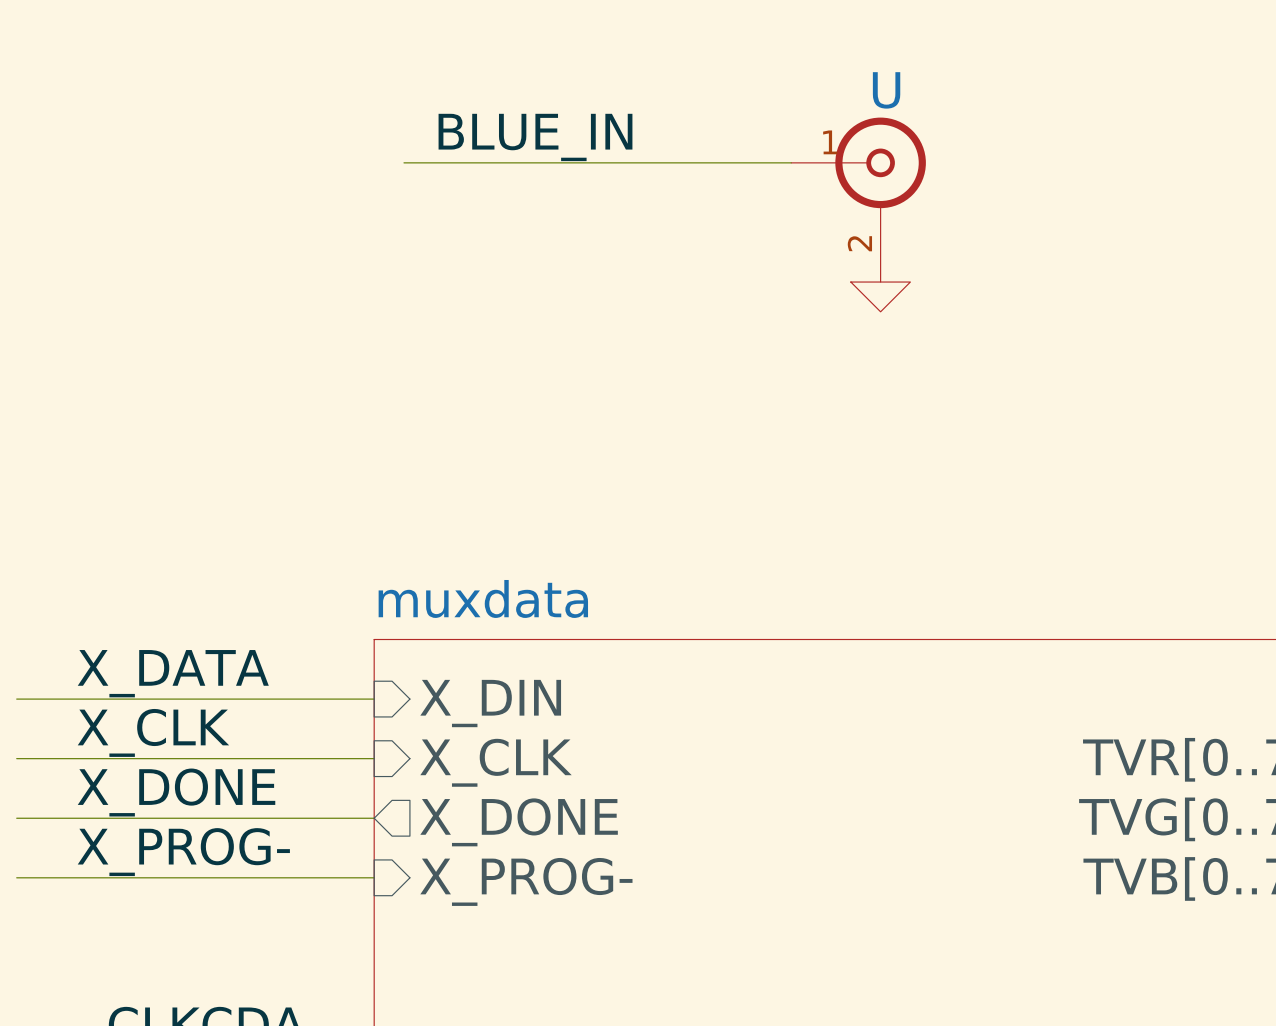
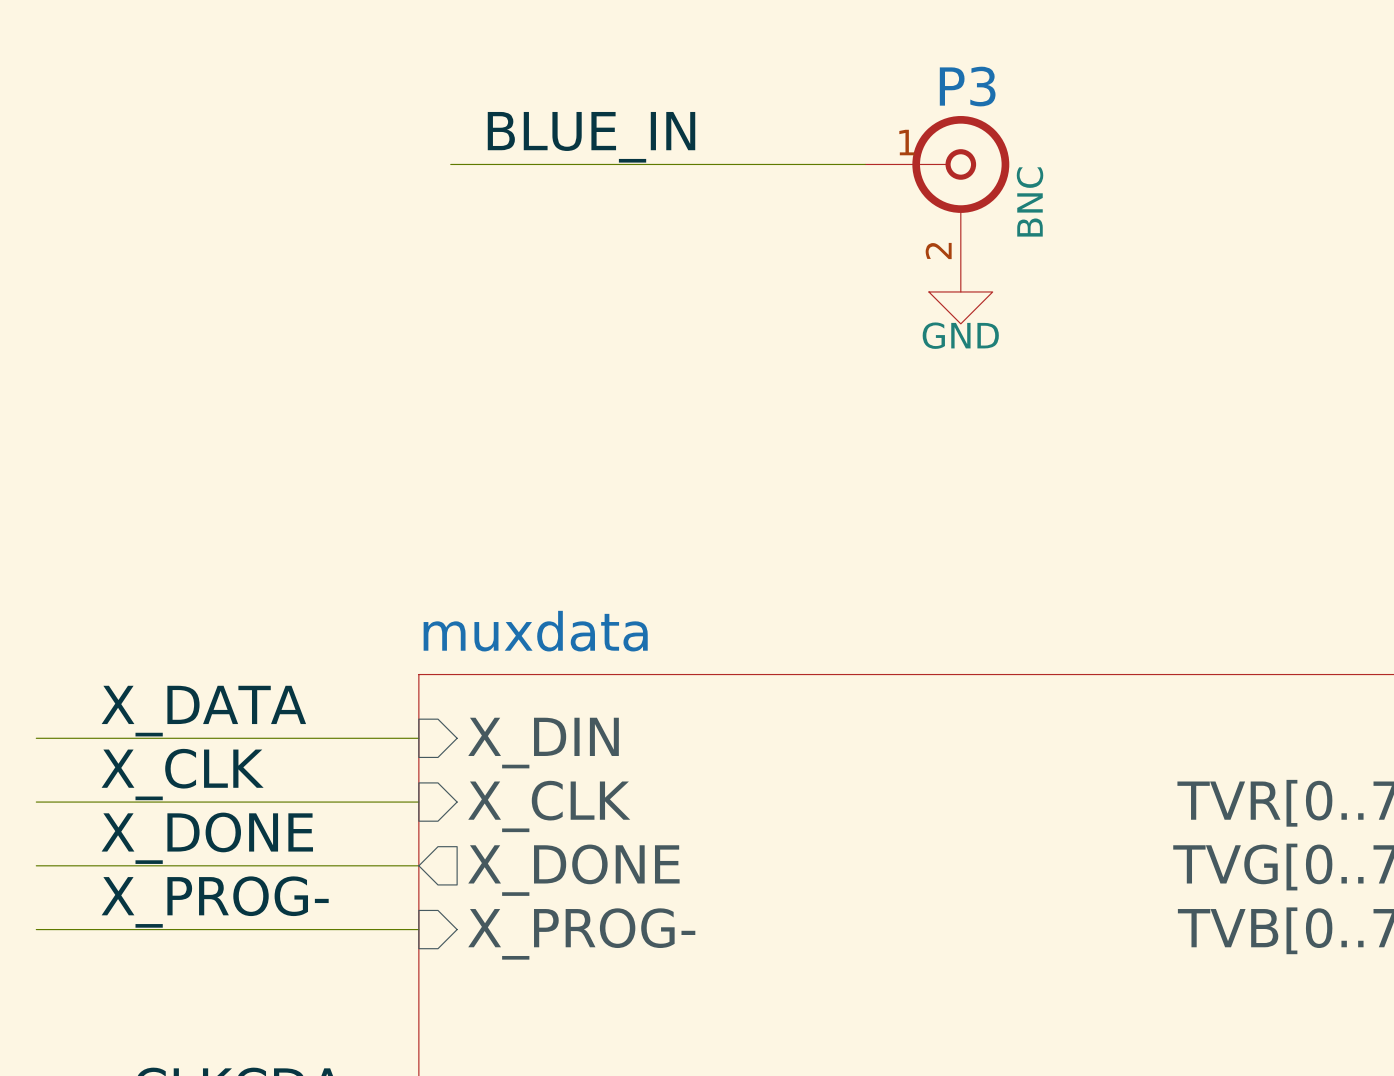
U name: U (886, 90) -> P3 (967, 86)
U value: none -> BNC (1030, 201)
power symbol text: none -> GND (960, 335)

